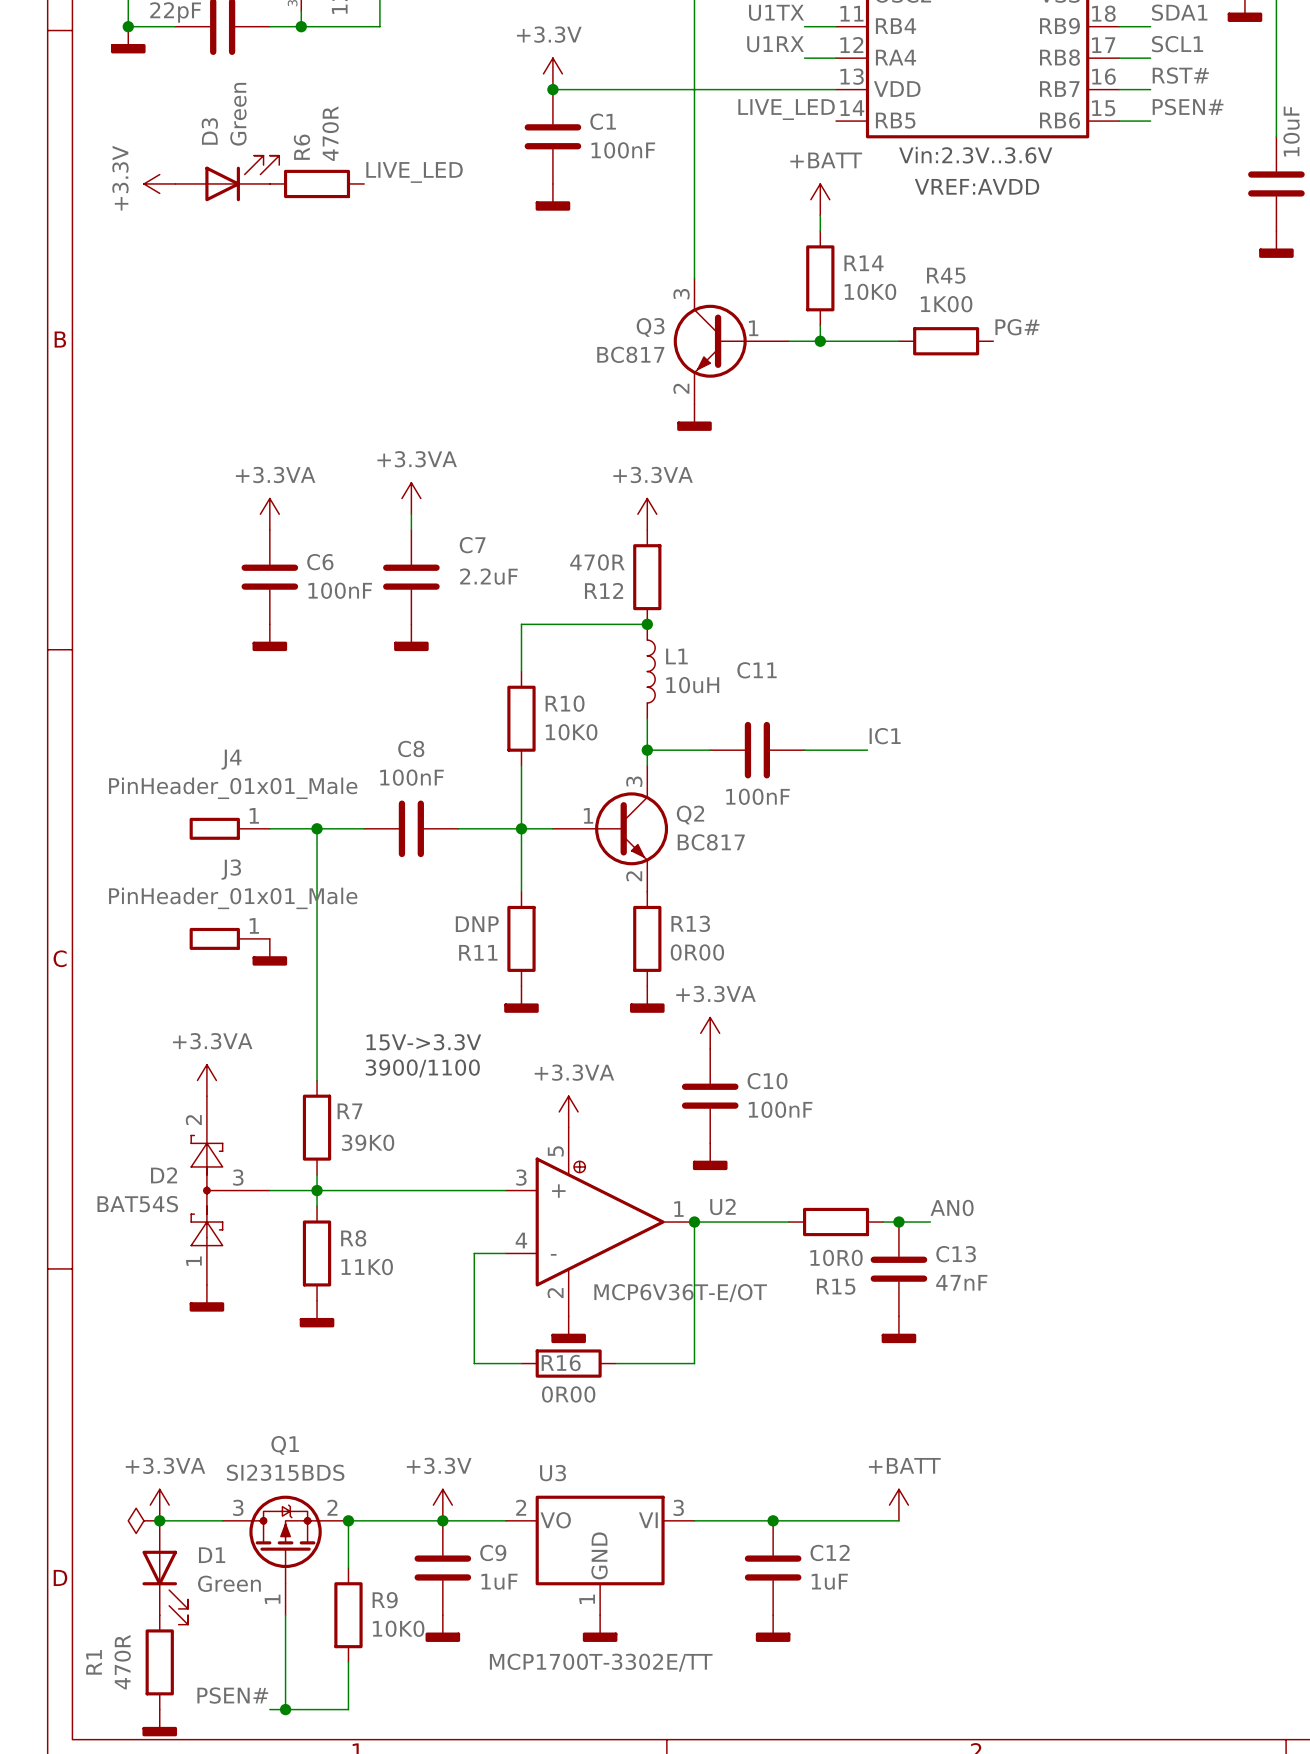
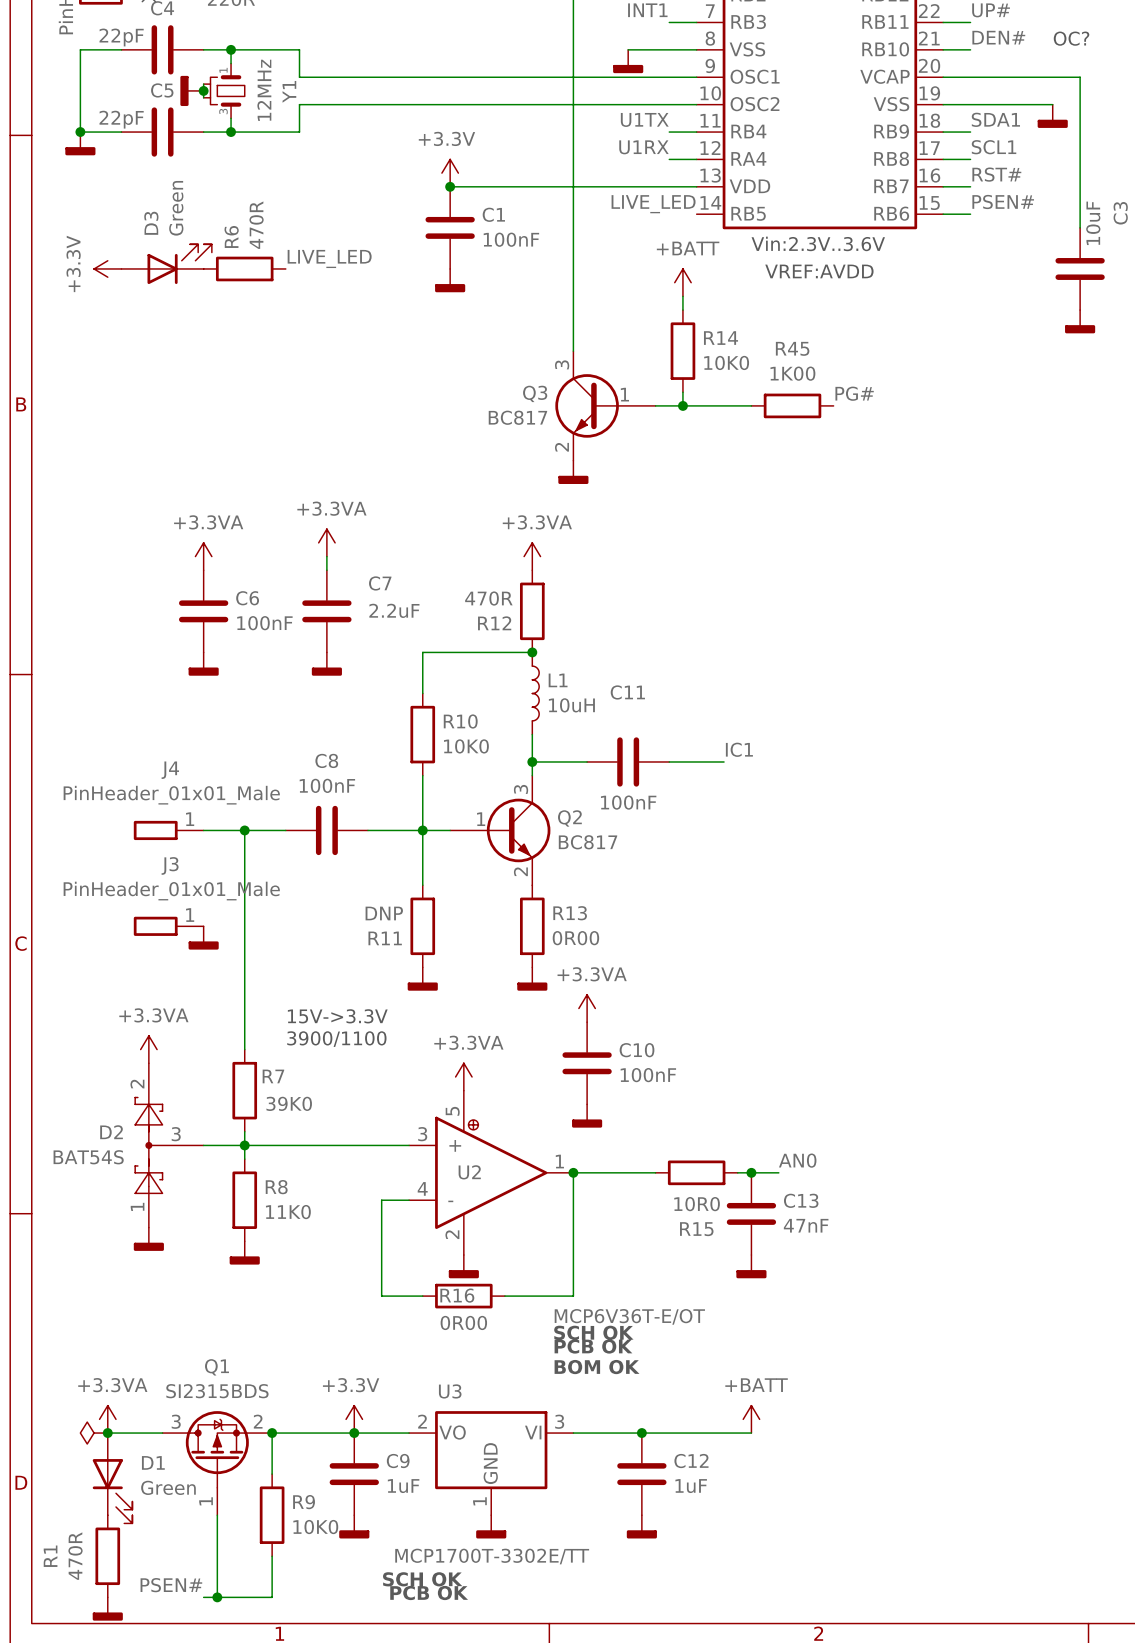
U2 name position: U2 (722, 1206) -> U2 (469, 1172)
U2 text position: MCP6V36T-E/OT (680, 1293) -> MCP6V36T-E/OT (629, 1316)
text: none -> SCH OK (593, 1332)
text: none -> PCB OK (593, 1346)
text: none -> BOM OK (597, 1367)
text: none -> SCH OK (422, 1579)
text: none -> PCB OK (429, 1593)

